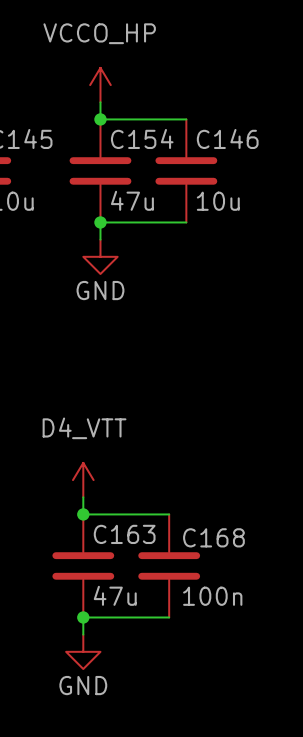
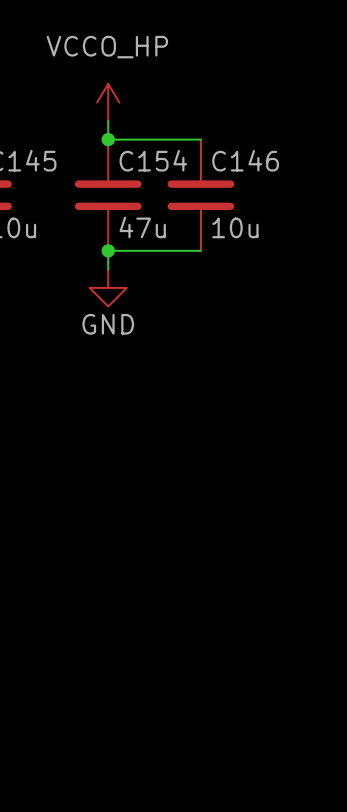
power symbol: D4_VTT (83, 480) -> none
wire: (83, 497) (83, 514) (169, 514) -> none
junction: (83, 514) -> none
C163: 47u (83, 565) -> none
C168: 100n (169, 565) -> none
junction: (83, 617) -> none
wire: (169, 617) (83, 617) (83, 634) -> none
power symbol: GND (83, 651) -> none

